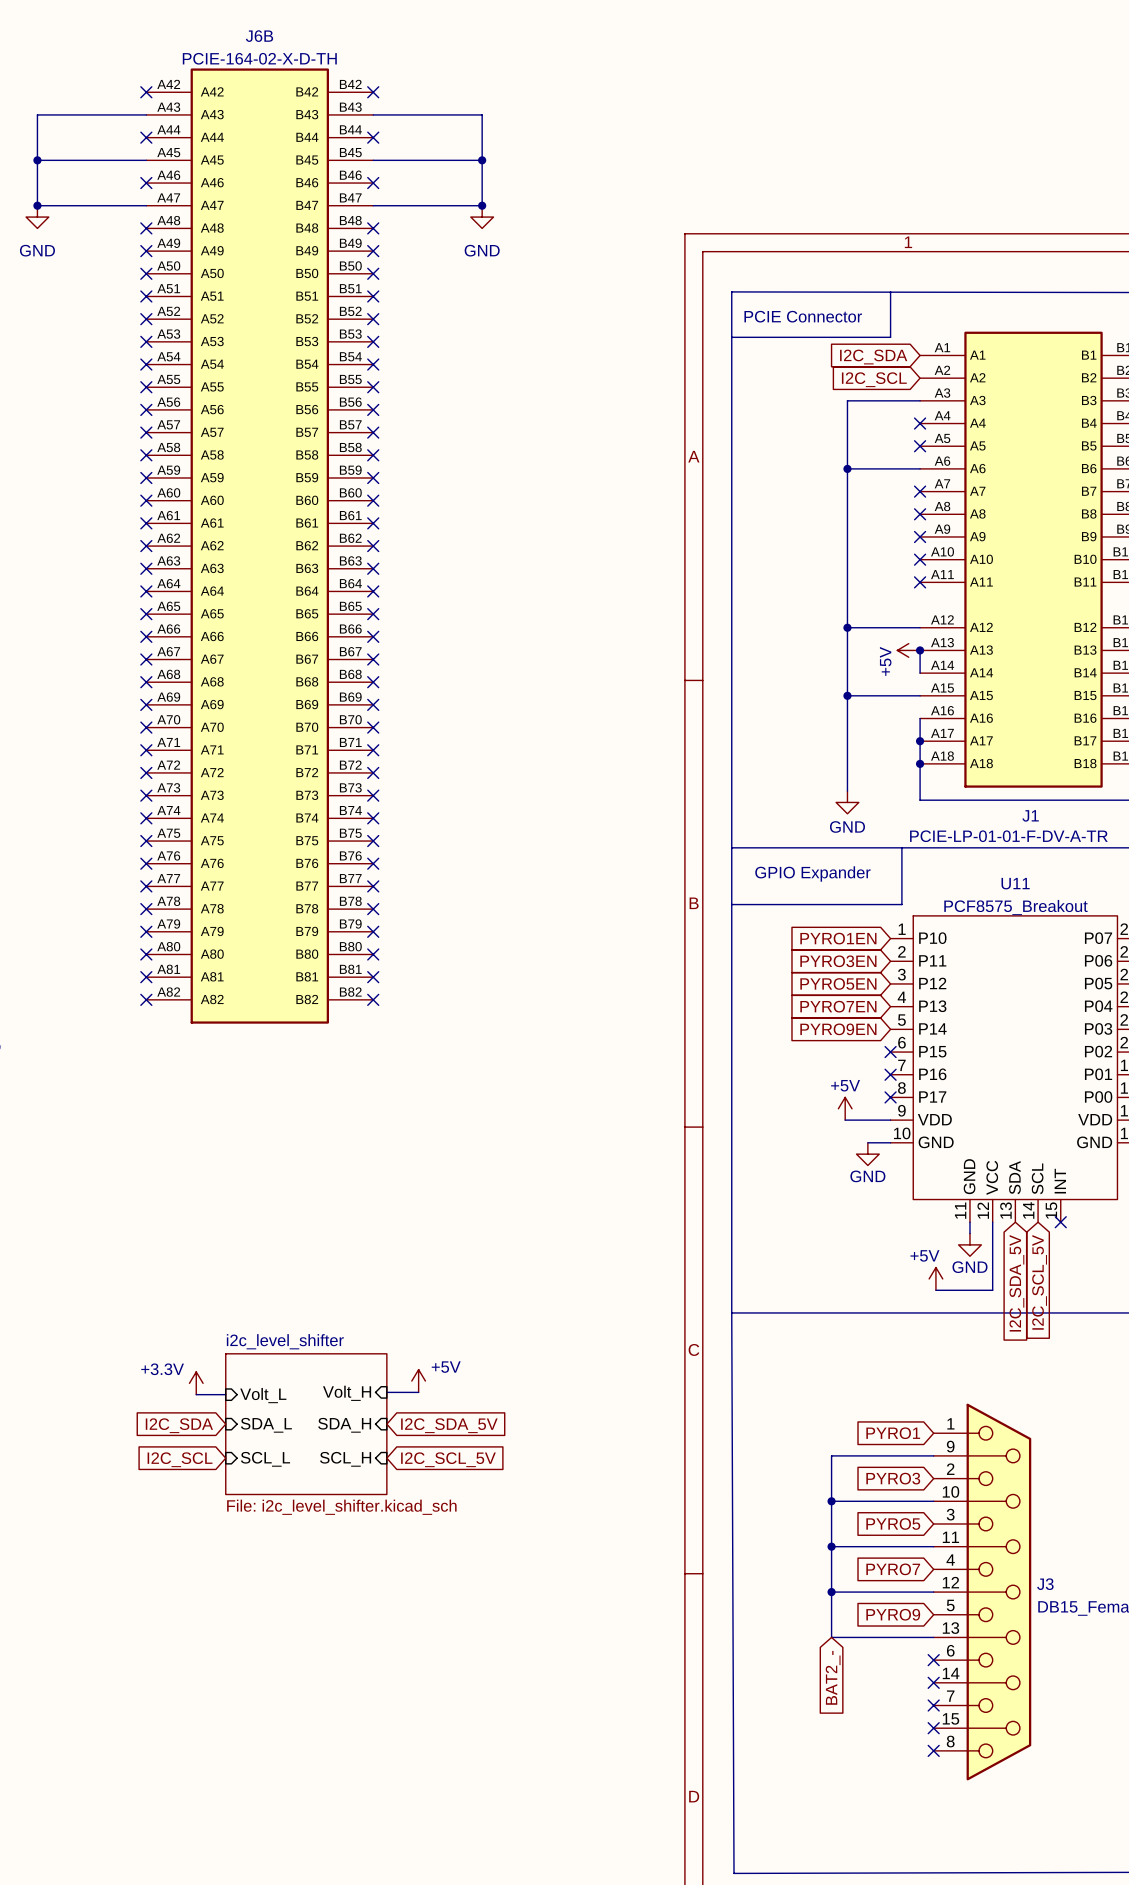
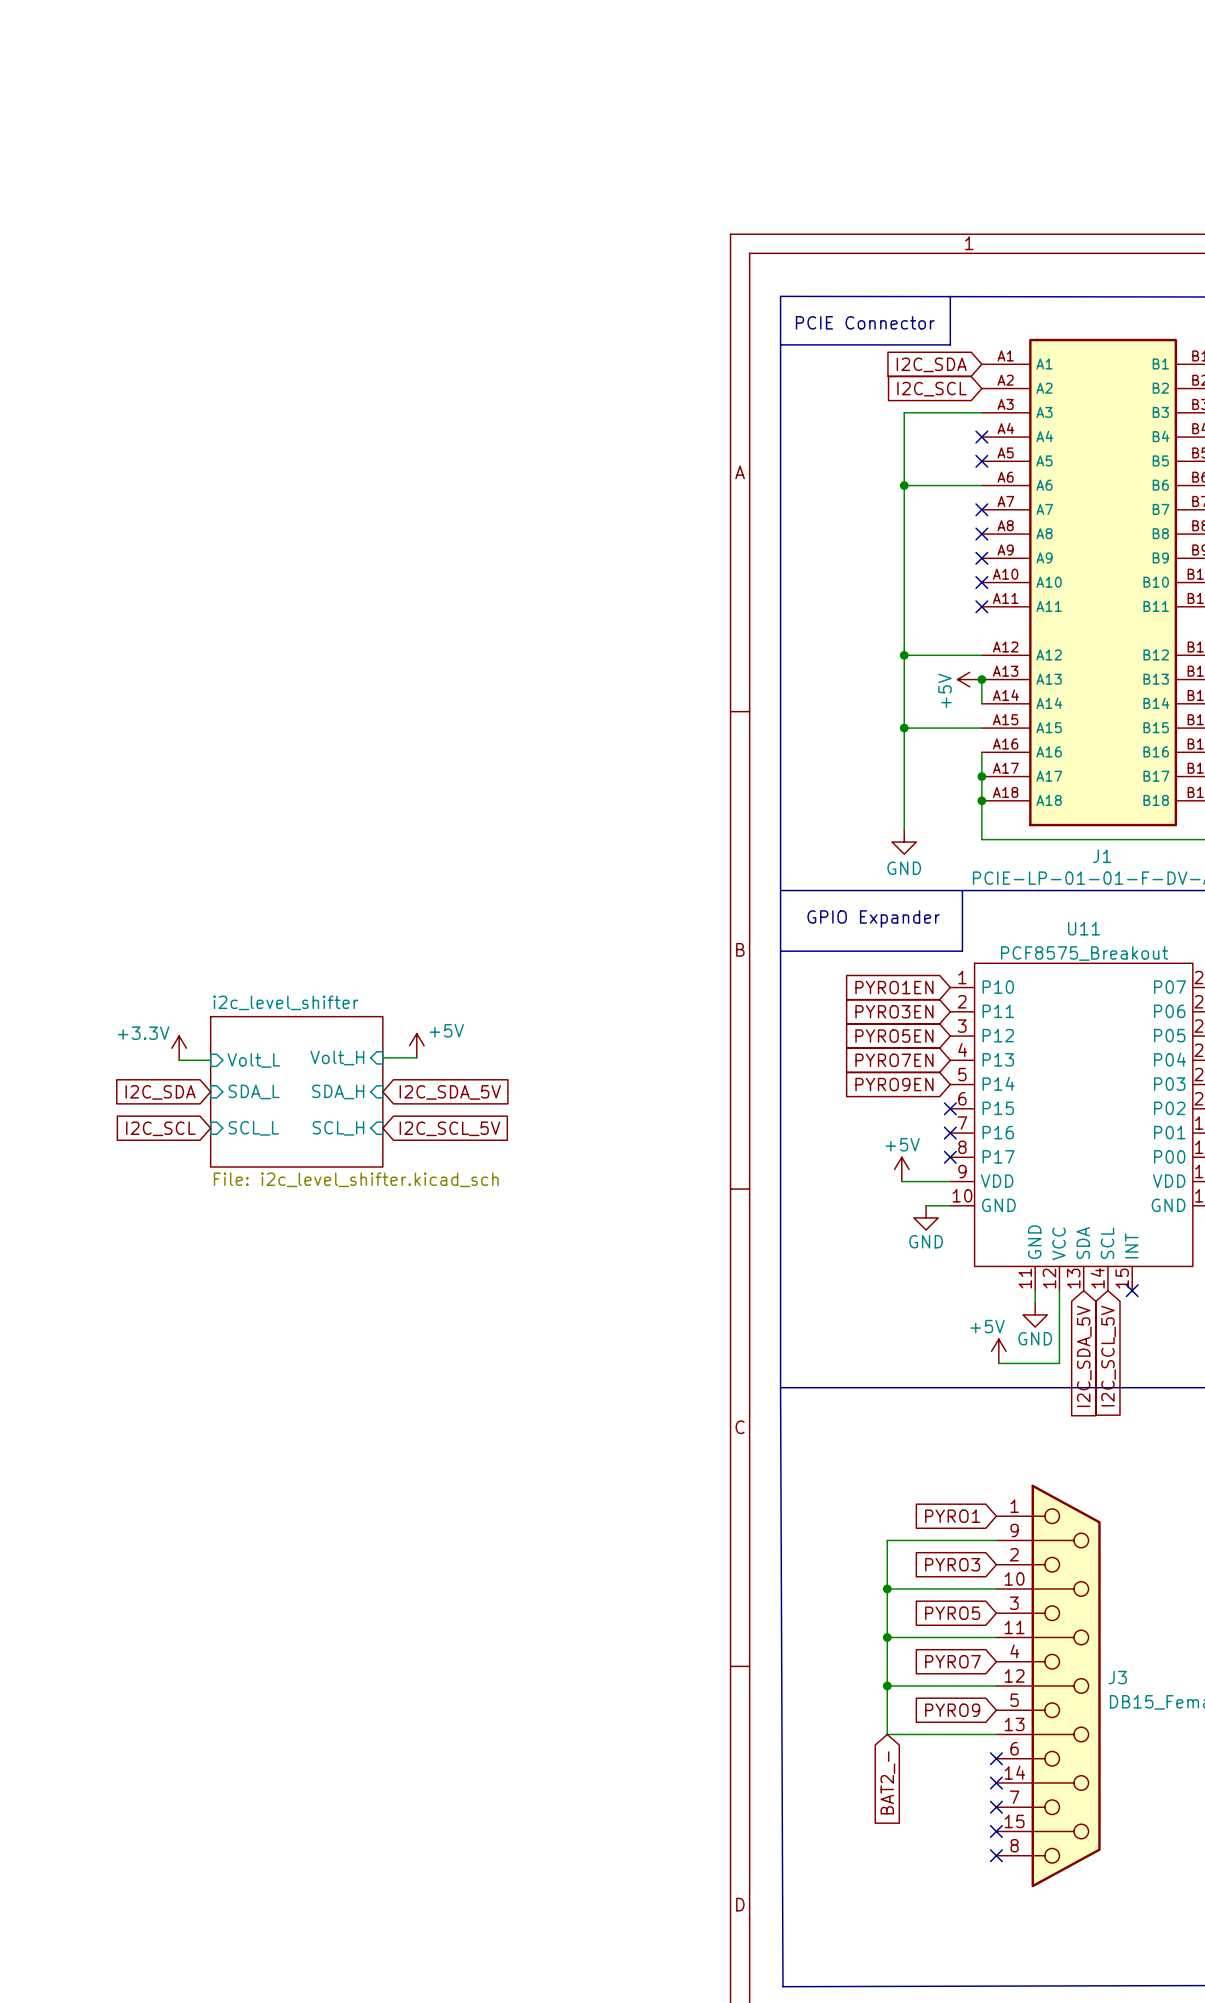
no-connect mark: (146, 92) -> none
no-connect mark: (373, 92) -> none
wire: (146, 114) (37, 114) (37, 205) (146, 205) -> none
wire: (373, 114) (482, 114) (482, 205) (373, 205) -> none
no-connect mark: (146, 137) -> none
no-connect mark: (373, 137) -> none
wire: (37, 160) (146, 160) -> none
junction: (37, 160) -> none
wire: (373, 160) (482, 160) -> none
junction: (482, 160) -> none
no-connect mark: (146, 183) -> none
no-connect mark: (373, 183) -> none
junction: (37, 205) -> none
junction: (482, 205) -> none
power symbol: GND (37, 217) -> none
power symbol: GND (482, 217) -> none
no-connect mark: (146, 228) -> none
no-connect mark: (373, 228) -> none
no-connect mark: (146, 251) -> none
no-connect mark: (373, 251) -> none
no-connect mark: (146, 273) -> none
no-connect mark: (373, 273) -> none
no-connect mark: (146, 296) -> none
no-connect mark: (373, 296) -> none
no-connect mark: (146, 319) -> none
no-connect mark: (373, 319) -> none
no-connect mark: (146, 341) -> none
no-connect mark: (373, 341) -> none
no-connect mark: (146, 364) -> none
no-connect mark: (373, 364) -> none
no-connect mark: (146, 387) -> none
no-connect mark: (373, 387) -> none
no-connect mark: (146, 409) -> none
no-connect mark: (373, 409) -> none
no-connect mark: (146, 432) -> none
no-connect mark: (373, 432) -> none
no-connect mark: (146, 455) -> none
no-connect mark: (373, 455) -> none
no-connect mark: (146, 477) -> none
no-connect mark: (373, 477) -> none
no-connect mark: (146, 500) -> none
no-connect mark: (373, 500) -> none
no-connect mark: (146, 523) -> none
no-connect mark: (373, 523) -> none
no-connect mark: (146, 546) -> none
J6B: PCIE-164-02-X-D-TH (259, 546) -> none
no-connect mark: (373, 546) -> none
no-connect mark: (146, 568) -> none
no-connect mark: (373, 568) -> none
no-connect mark: (146, 591) -> none
no-connect mark: (373, 591) -> none
no-connect mark: (146, 614) -> none
no-connect mark: (373, 614) -> none
no-connect mark: (146, 636) -> none
no-connect mark: (373, 636) -> none
no-connect mark: (146, 659) -> none
no-connect mark: (373, 659) -> none
no-connect mark: (146, 682) -> none
no-connect mark: (373, 682) -> none
no-connect mark: (146, 704) -> none
no-connect mark: (373, 704) -> none
no-connect mark: (146, 727) -> none
no-connect mark: (373, 727) -> none
no-connect mark: (146, 750) -> none
no-connect mark: (373, 750) -> none
no-connect mark: (146, 772) -> none
no-connect mark: (373, 772) -> none
no-connect mark: (146, 795) -> none
no-connect mark: (373, 795) -> none
no-connect mark: (146, 818) -> none
no-connect mark: (373, 818) -> none
no-connect mark: (146, 841) -> none
no-connect mark: (373, 841) -> none
no-connect mark: (146, 863) -> none
no-connect mark: (373, 863) -> none
no-connect mark: (146, 886) -> none
no-connect mark: (373, 886) -> none
no-connect mark: (146, 909) -> none
no-connect mark: (373, 909) -> none
no-connect mark: (146, 931) -> none
no-connect mark: (373, 931) -> none
no-connect mark: (146, 954) -> none
no-connect mark: (373, 954) -> none
no-connect mark: (146, 977) -> none
no-connect mark: (373, 977) -> none
power symbol: none -> +5V (416, 1045)
power symbol: none -> +3.3V (179, 1048)
no-connect mark: (146, 999) -> none
no-connect mark: (373, 999) -> none
wire: none -> (382, 1057) (416, 1057)
sheet pin: none -> Volt_H (337, 1058)
wire: none -> (179, 1060) (210, 1060)
sheet pin: none -> Volt_L (253, 1060)
global label: none -> I2C_SDA (160, 1092)
sheet pin: none -> SDA_L (254, 1091)
sheet pin: none -> SDA_H (338, 1091)
global label: none -> I2C_SDA_5V (450, 1092)
global label: none -> I2C_SCL (160, 1128)
sheet pin: none -> SCL_L (253, 1128)
sheet pin: none -> SCL_H (338, 1128)
global label: none -> I2C_SCL_5V (449, 1128)
power symbol: +5V (418, 1381) -> none
power symbol: +3.3V (196, 1383) -> none
wire: (386, 1392) (418, 1392) -> none
sheet pin: Volt_H (347, 1393) -> none
wire: (196, 1394) (225, 1394) -> none
sheet pin: Volt_L (263, 1395) -> none
sheet i2c_level_shifter position: (306, 1424) -> (296, 1091)
global label: I2C_SDA (179, 1425) -> none
sheet pin: SDA_L (266, 1425) -> none
sheet pin: SDA_H (344, 1425) -> none
global label: I2C_SDA_5V (449, 1425) -> none
global label: I2C_SCL (180, 1459) -> none
sheet pin: SCL_L (265, 1459) -> none
sheet pin: SCL_H (345, 1459) -> none
global label: I2C_SCL_5V (448, 1459) -> none

